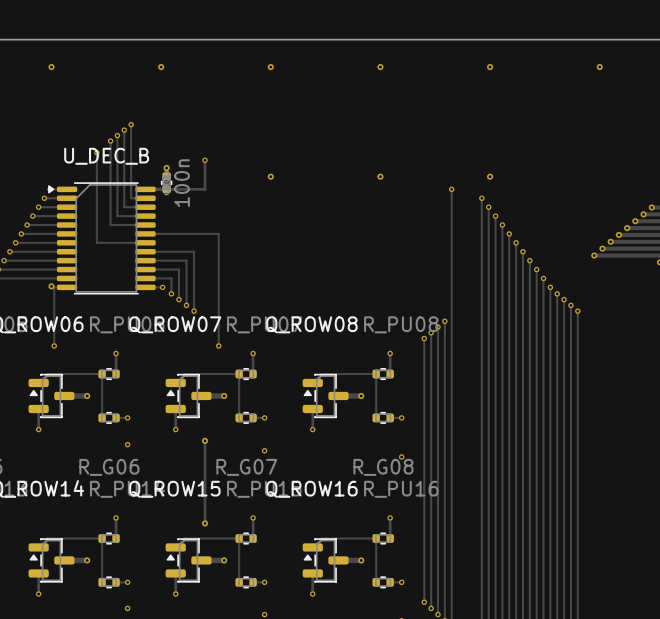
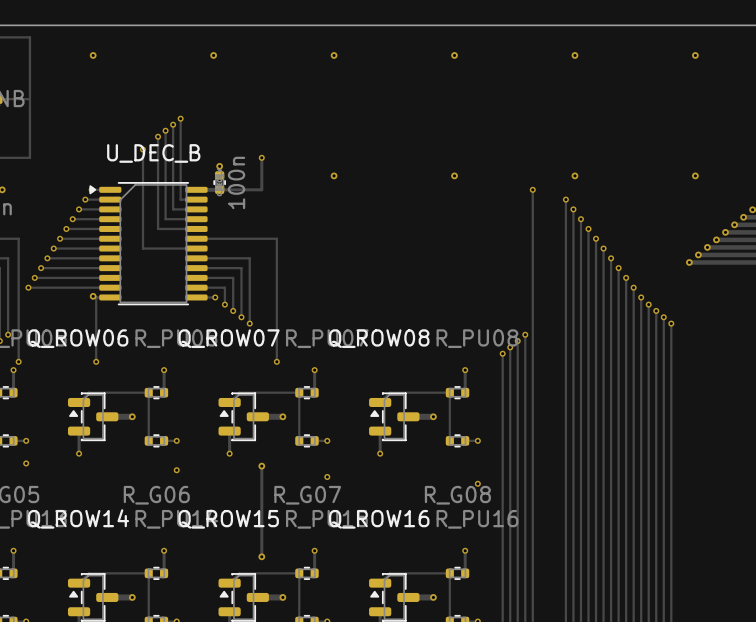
via: none -> (695, 175)

